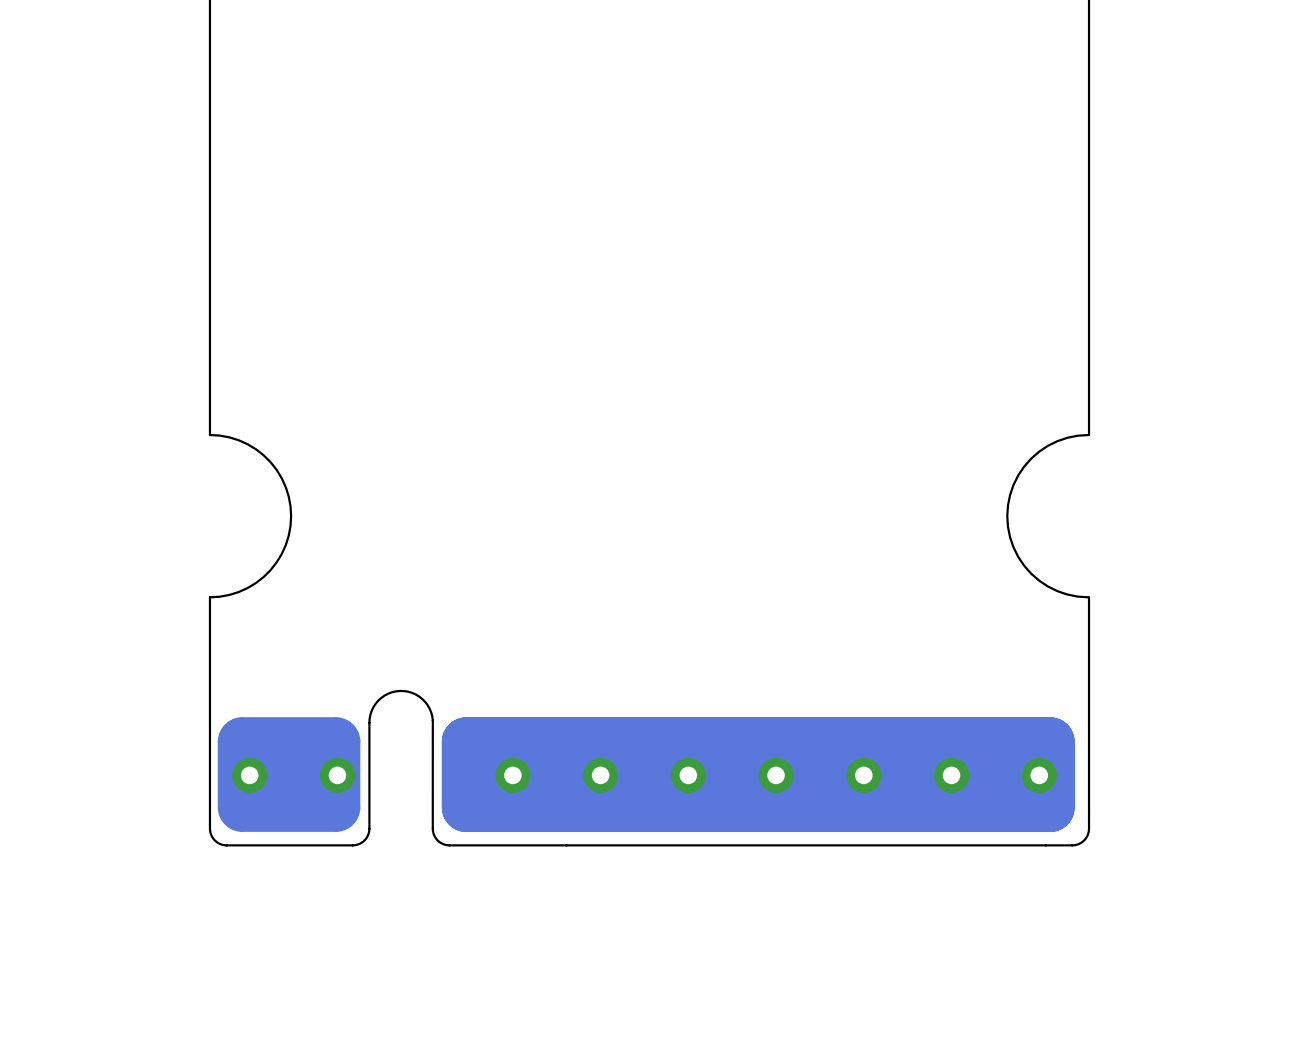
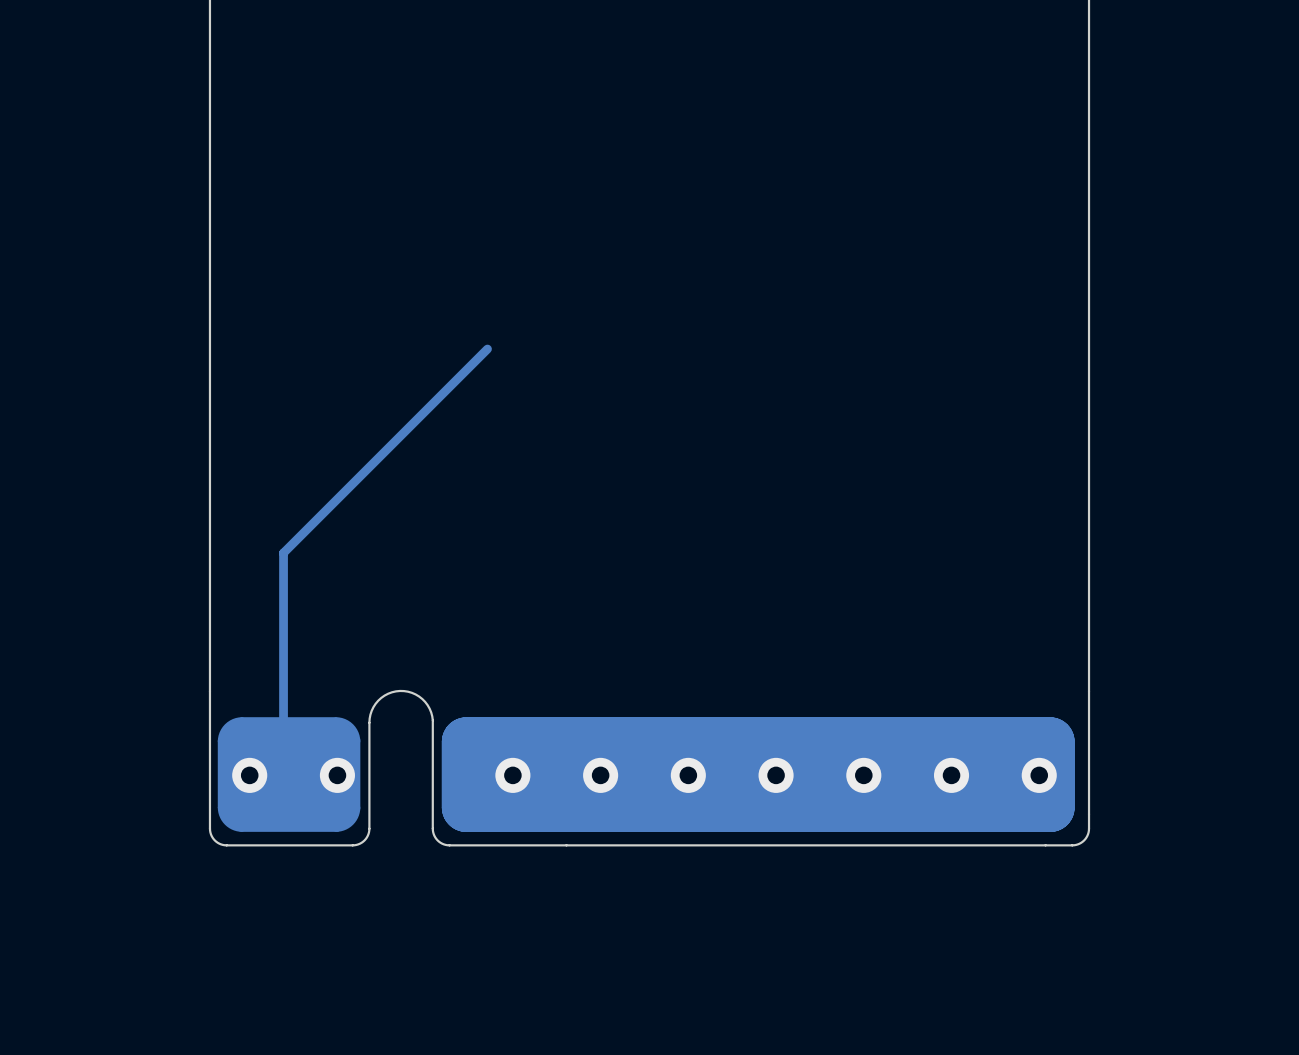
track: none -> (487, 349) (283, 553) (283, 745)
board edge: (209, 434) (238, 440) (263, 455) (281, 478) (288, 496) (291, 516) (285, 544) (270, 569) (247, 588) (229, 594) (209, 597) -> (209, 435) (209, 597)
board edge: (1088, 435) (1057, 441) (1031, 458) (1013, 485) (1007, 516) (1013, 547) (1031, 573) (1057, 591) (1088, 597) -> (1089, 435) (1089, 597)

